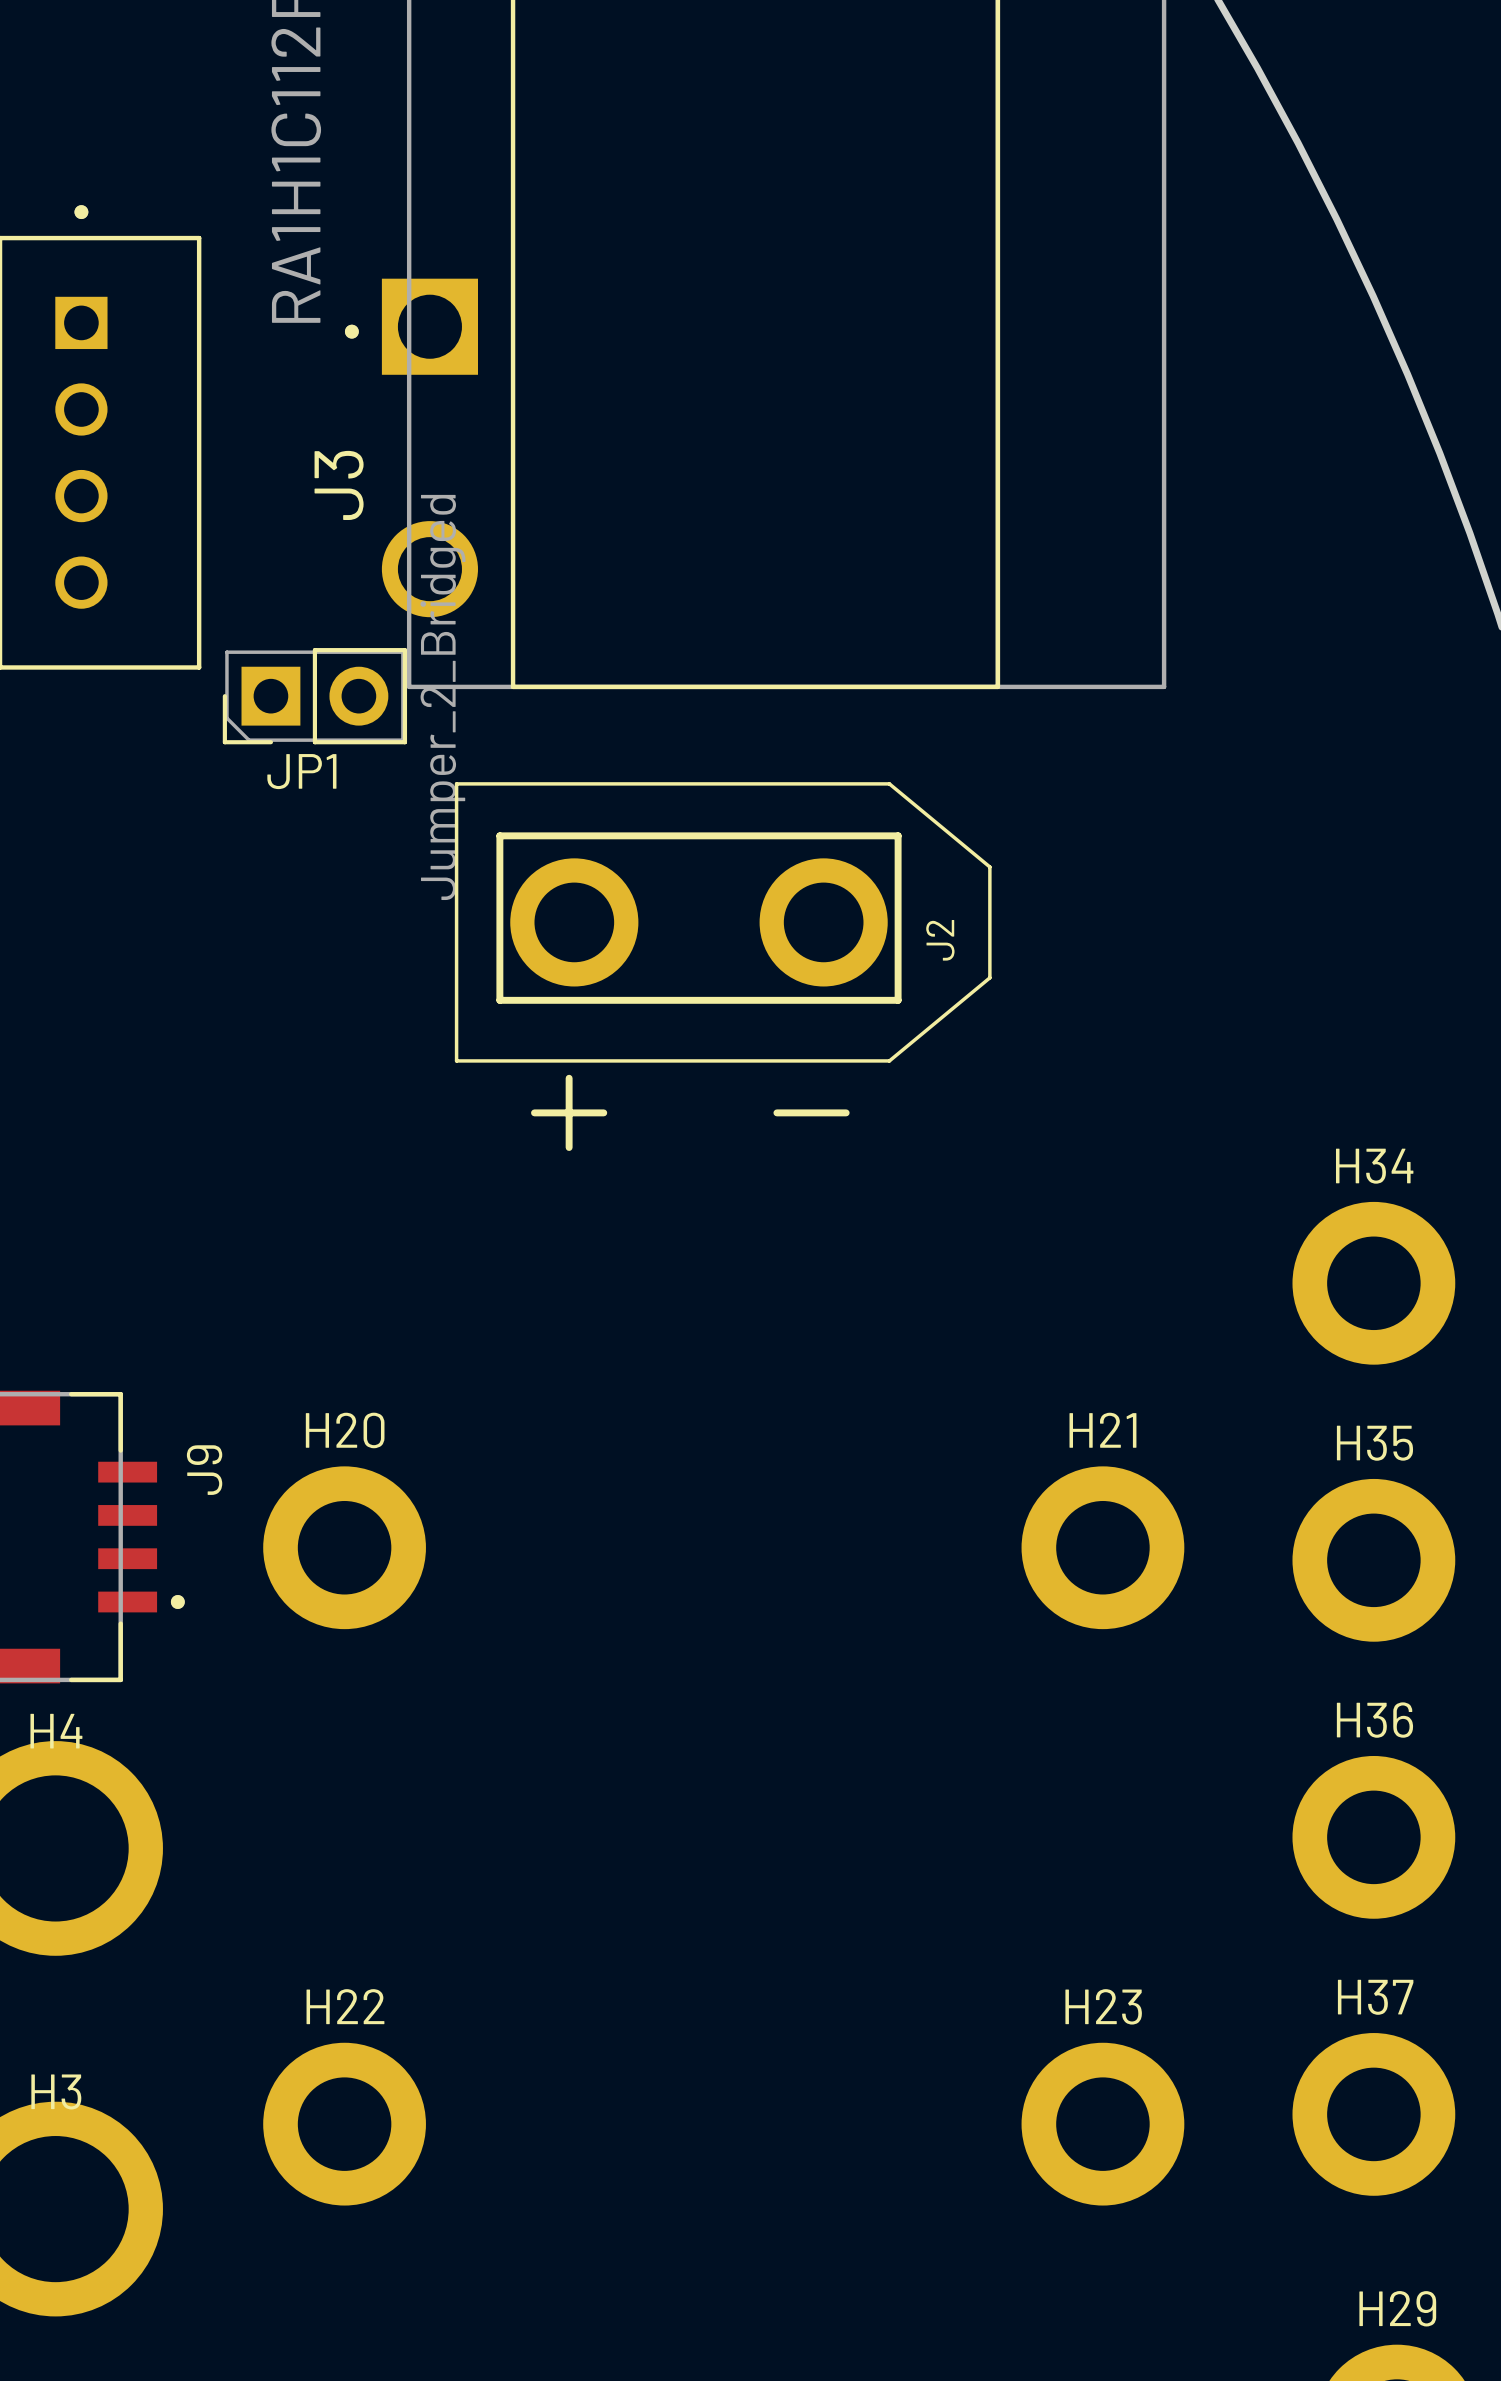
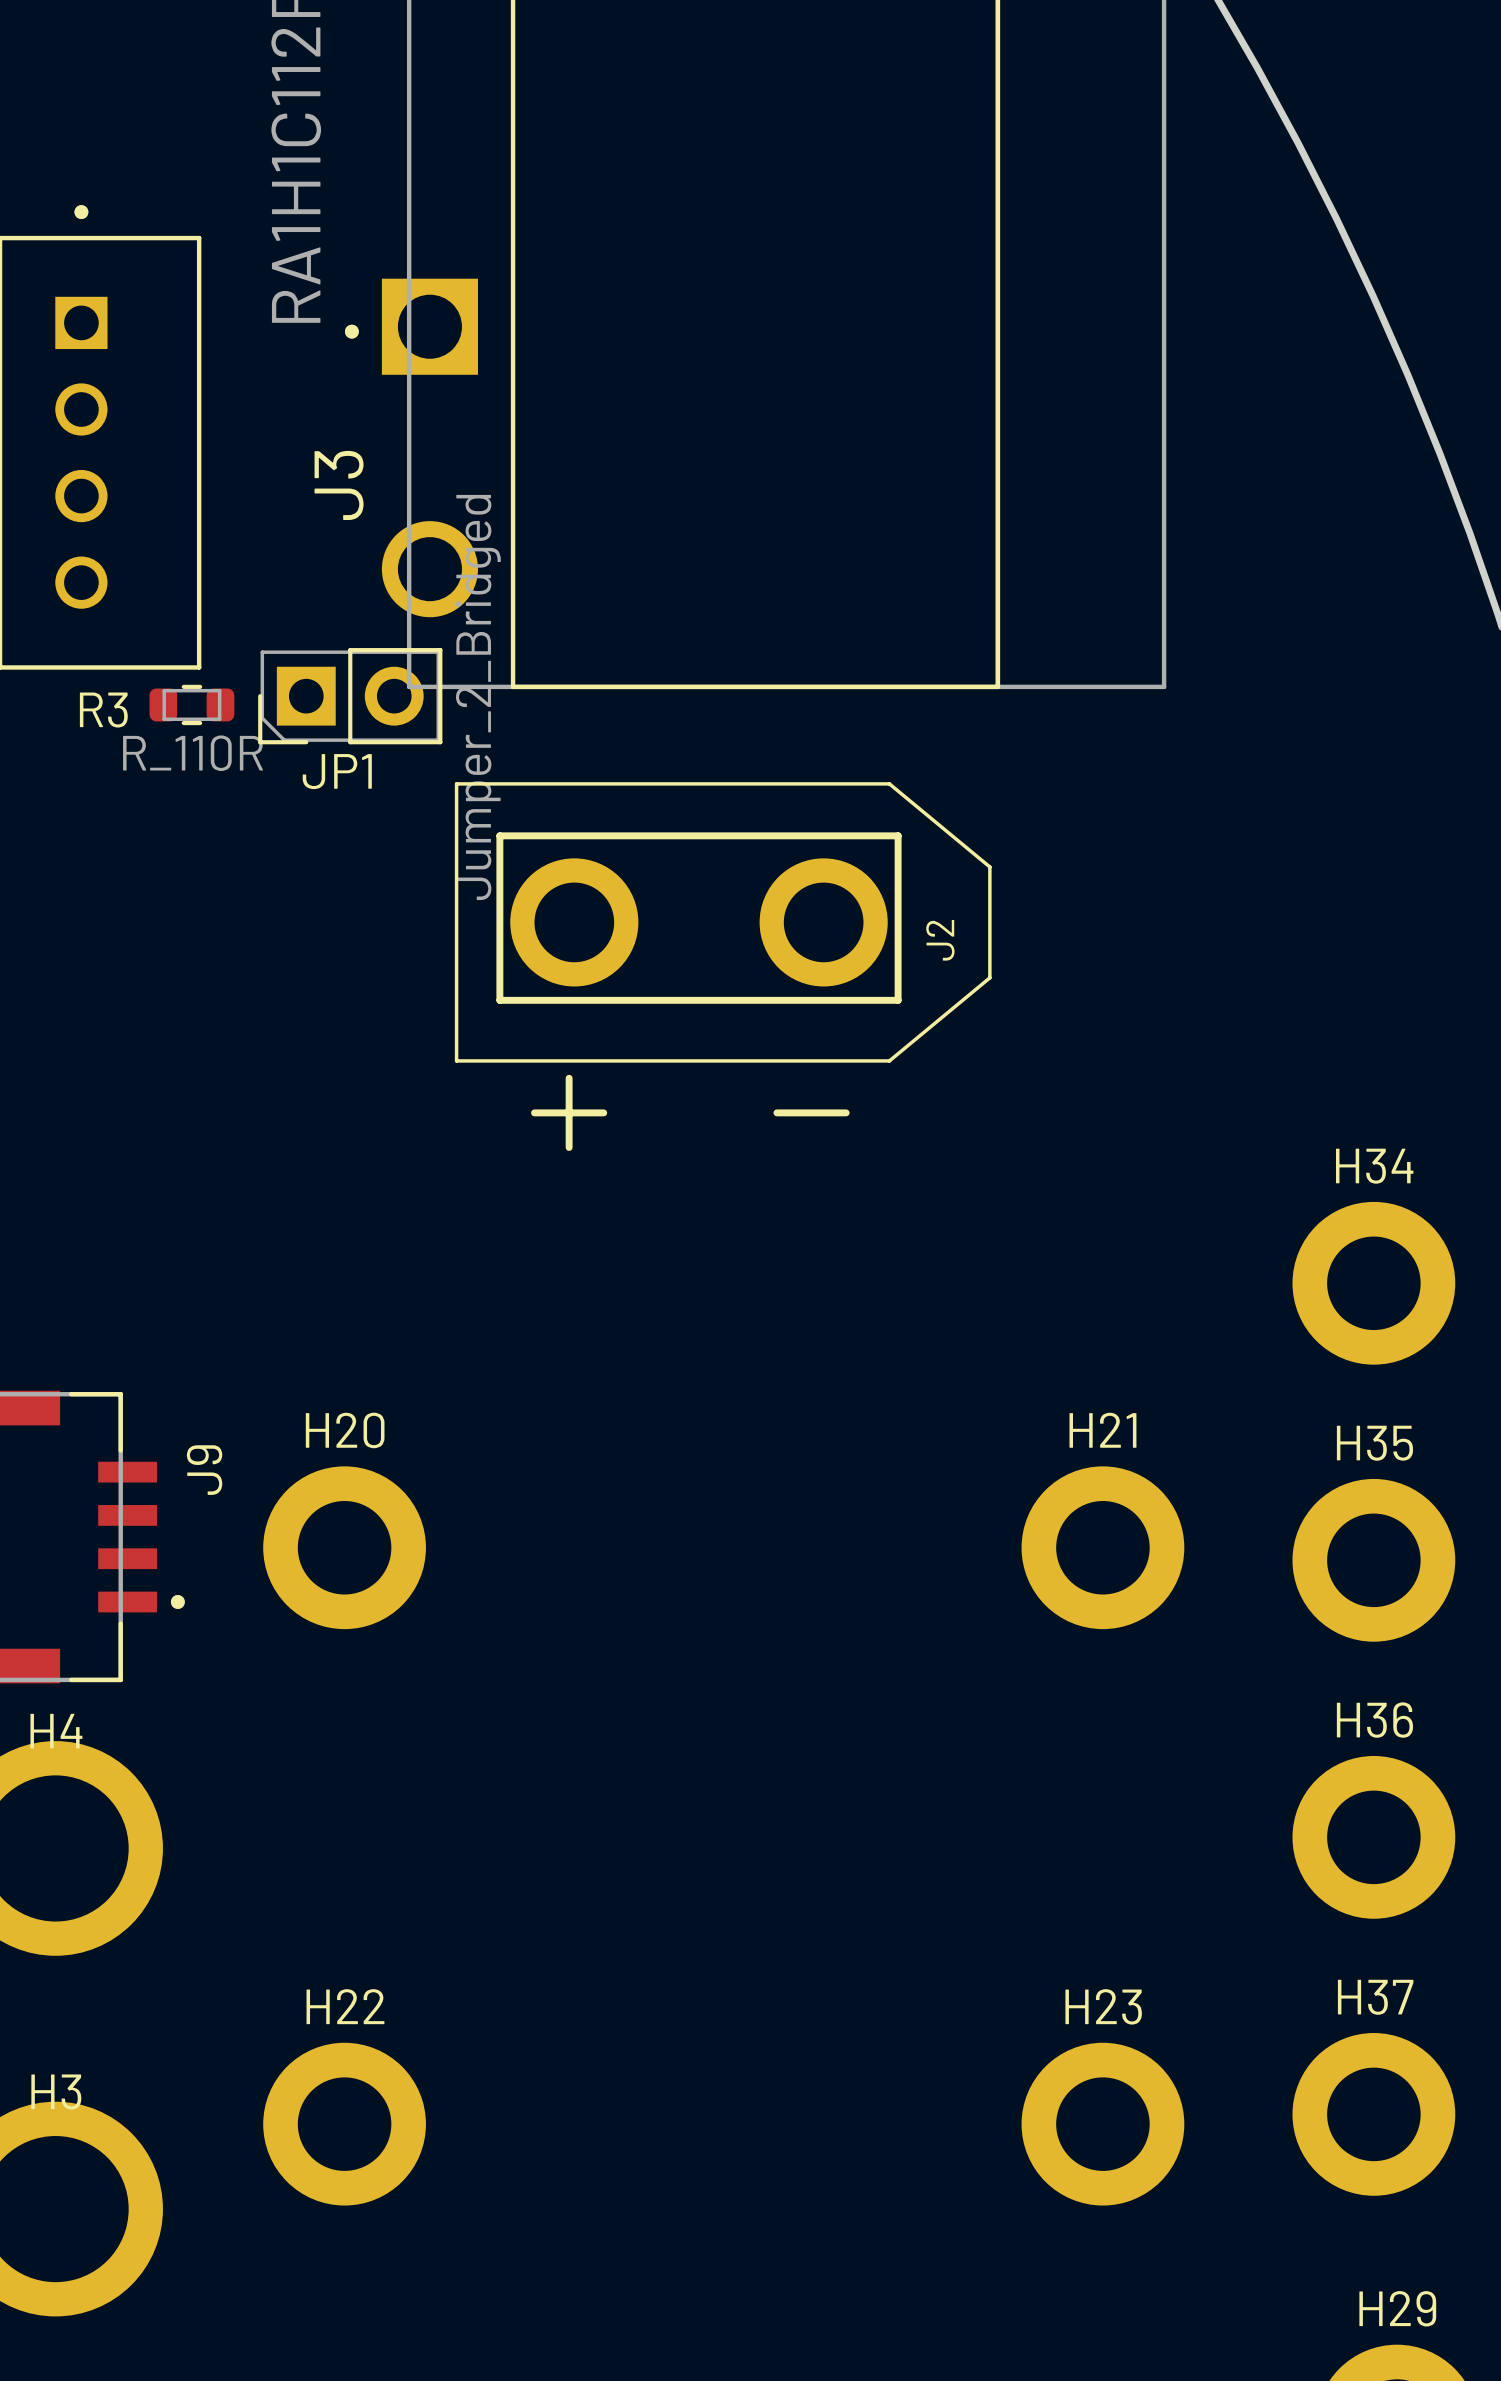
JP1 position: (314, 696) -> (350, 696)
R3: none -> R_110R (191, 704)

